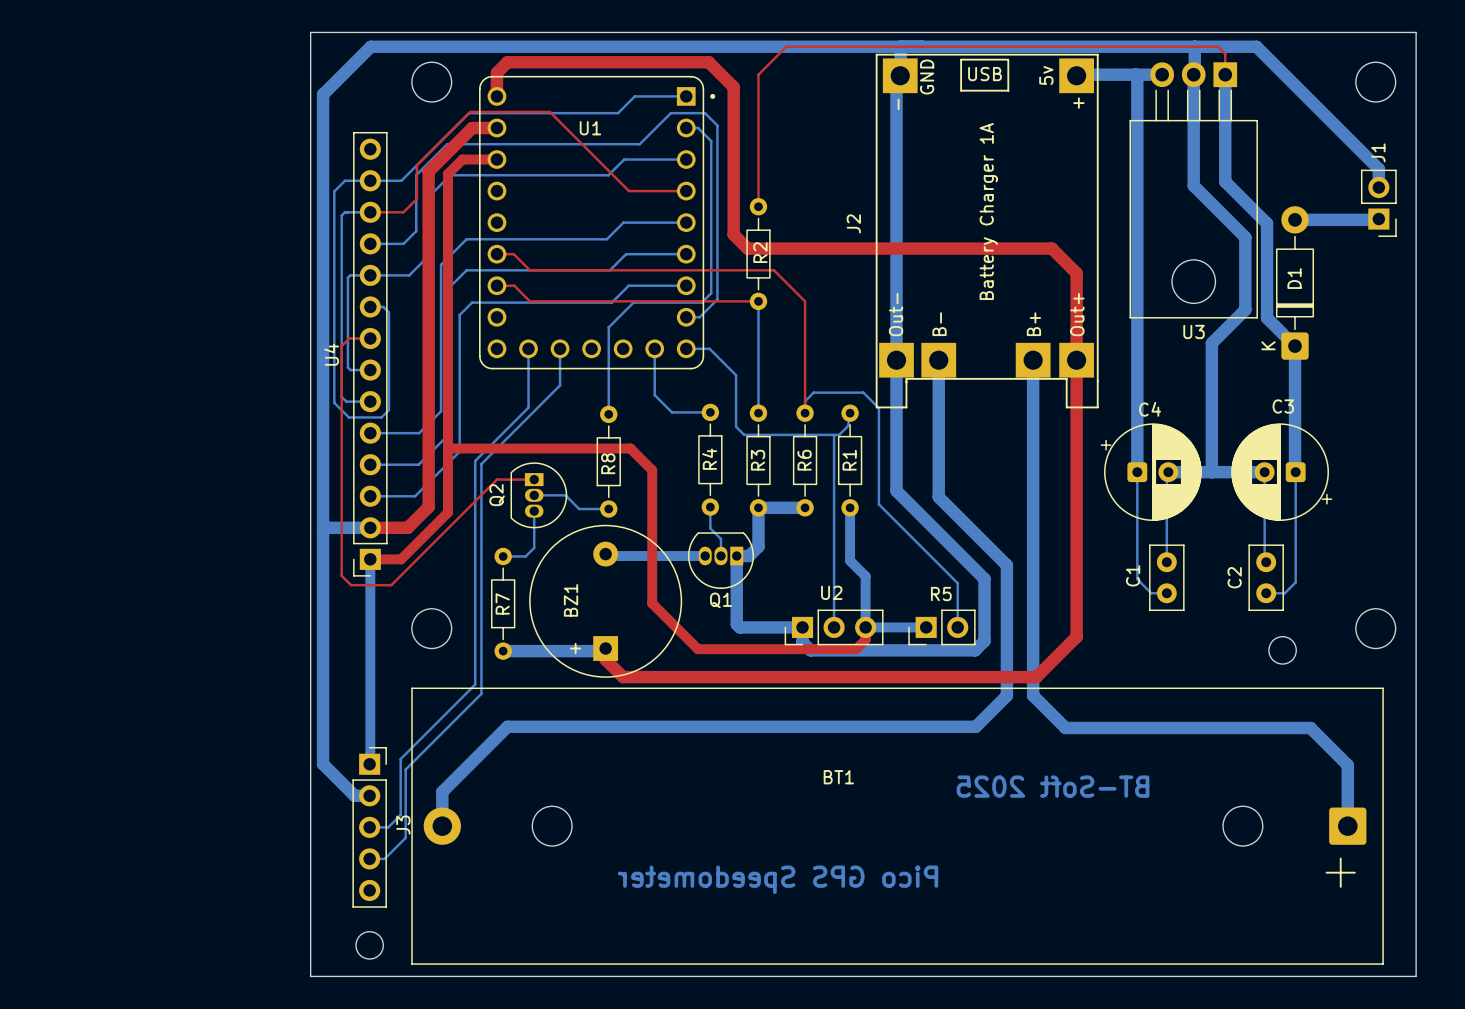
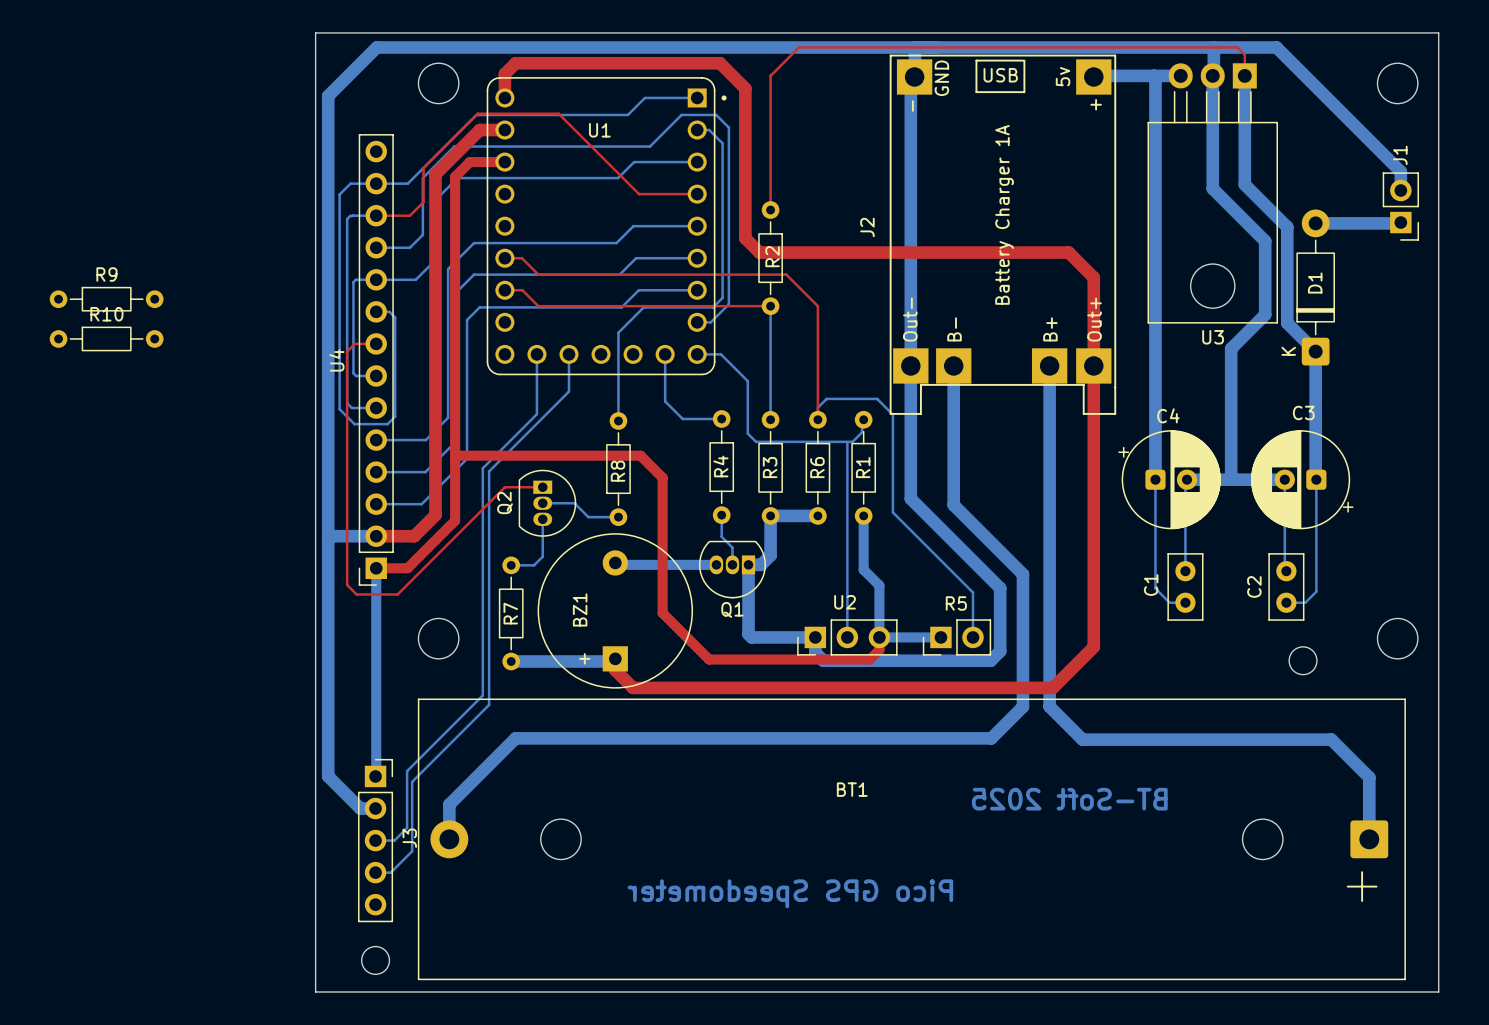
R9: none -> (106, 299)
R10: none -> (106, 338)

